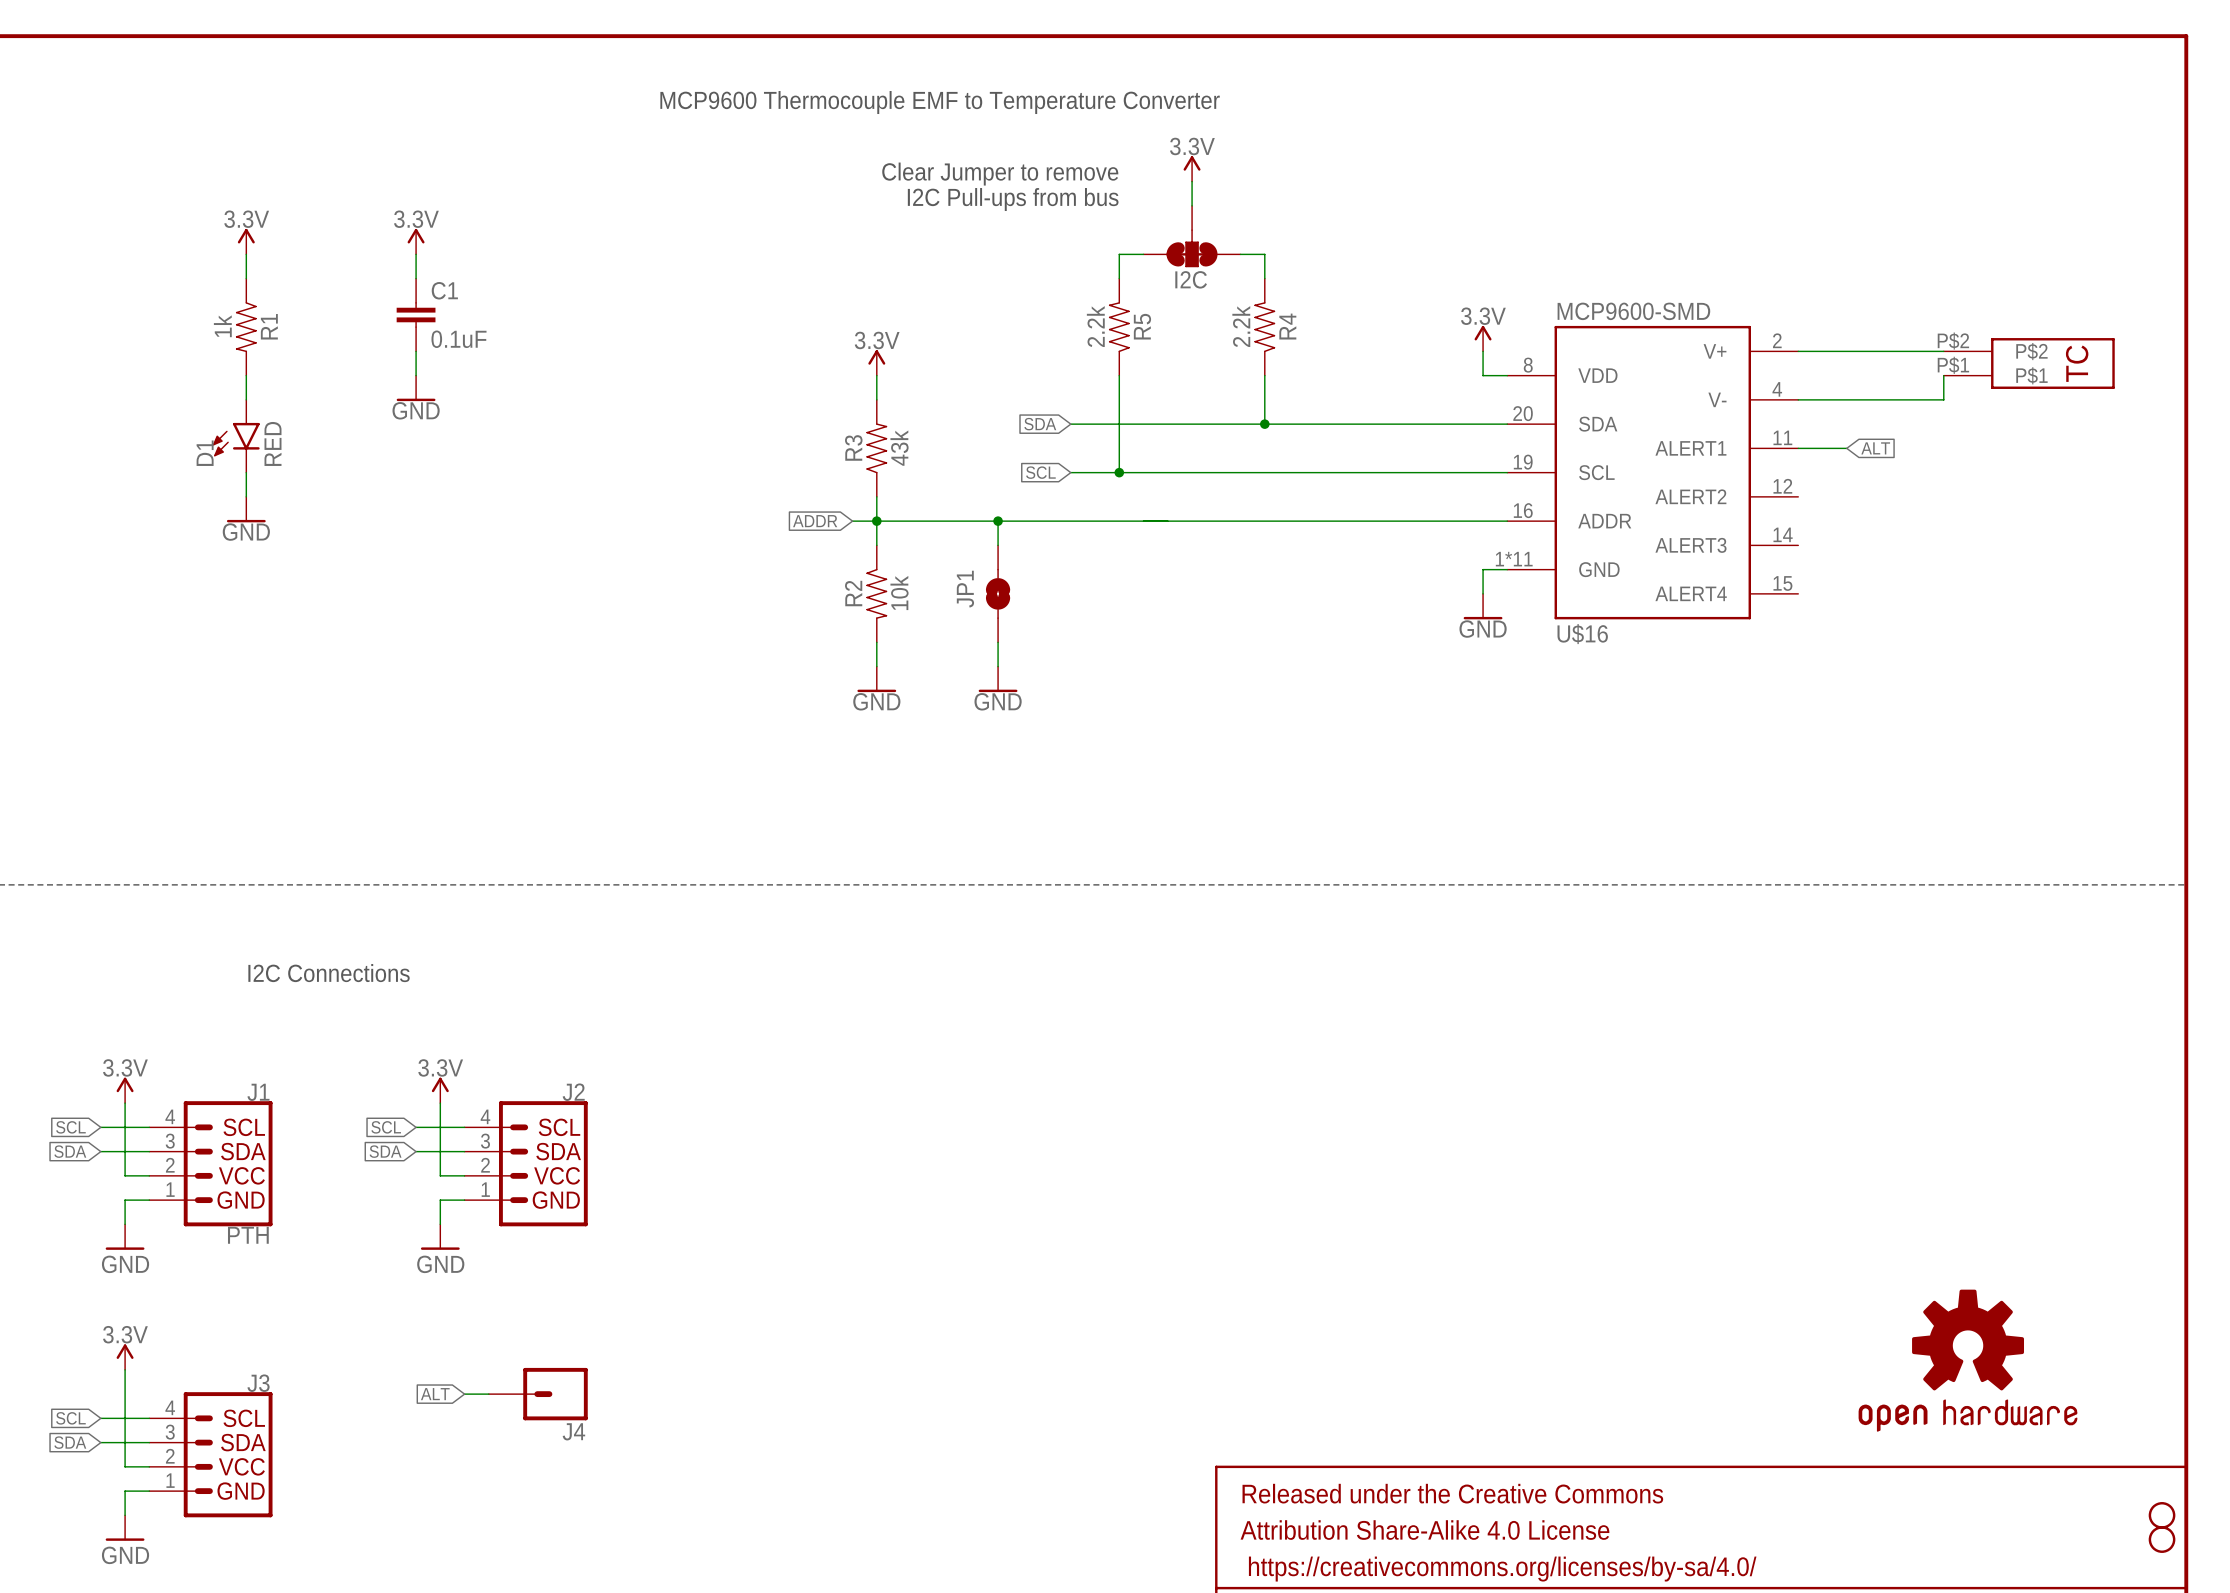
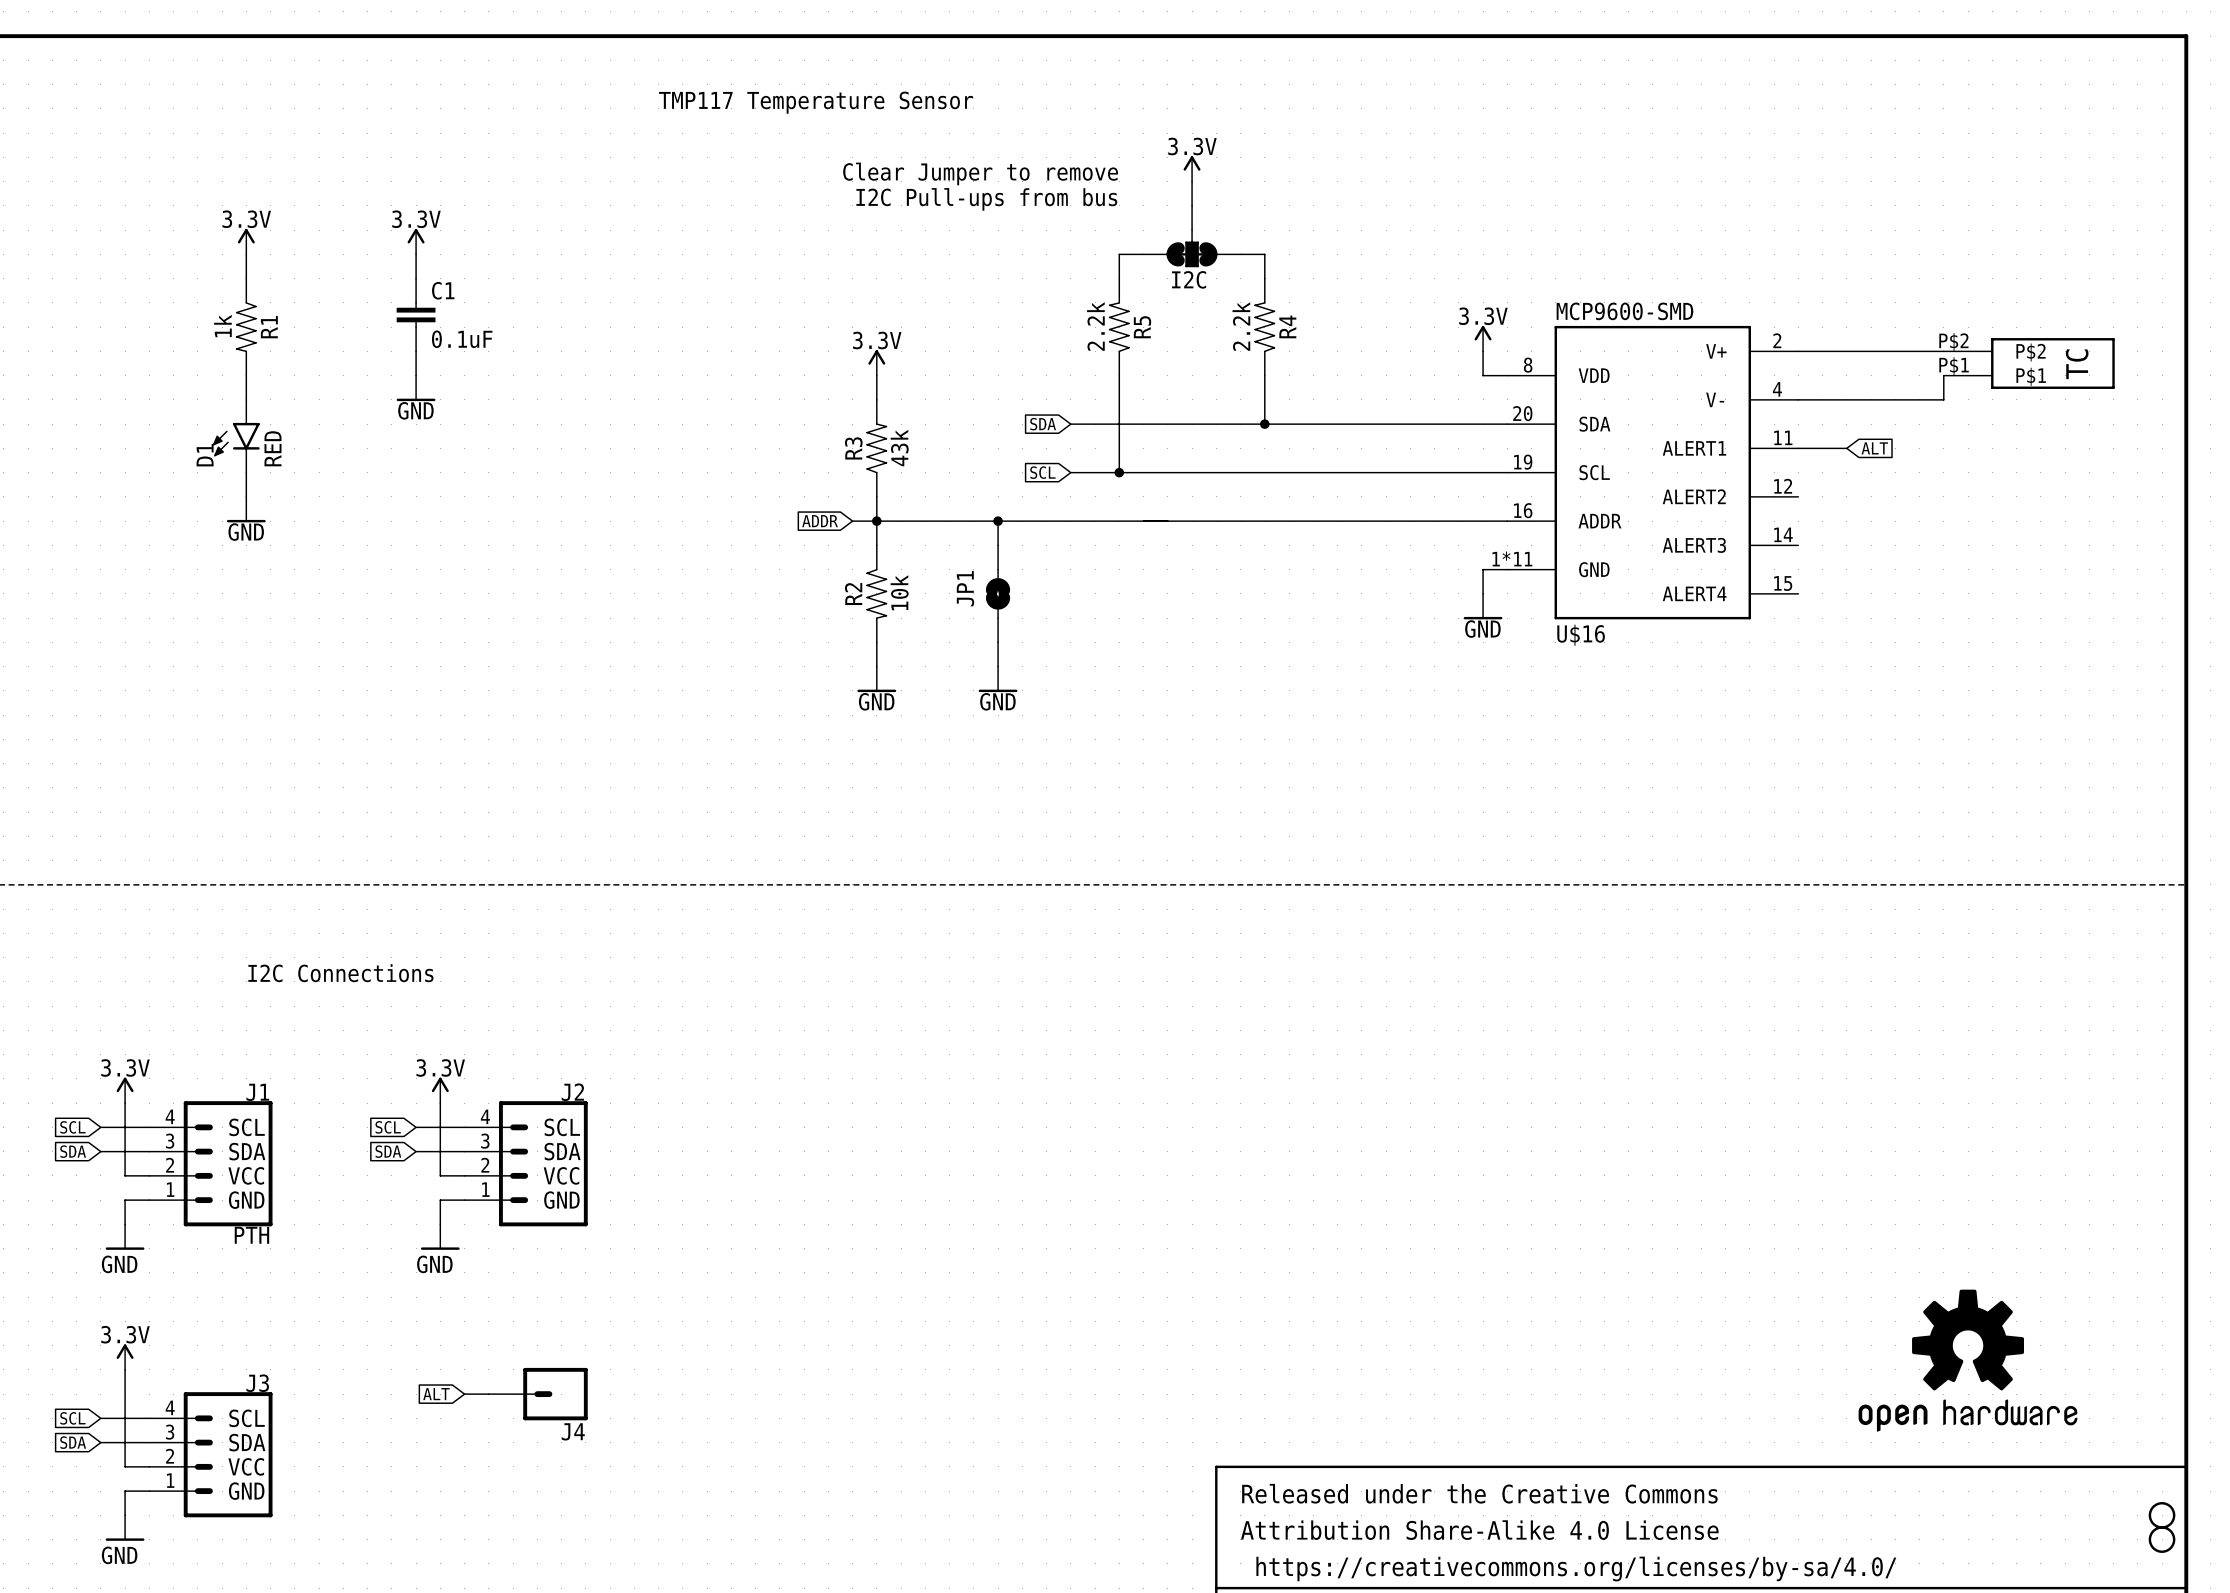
text: MCP9600 Thermocouple EMF to Temperature Converter (940, 102) -> TMP117 Temperature Sensor (816, 102)

